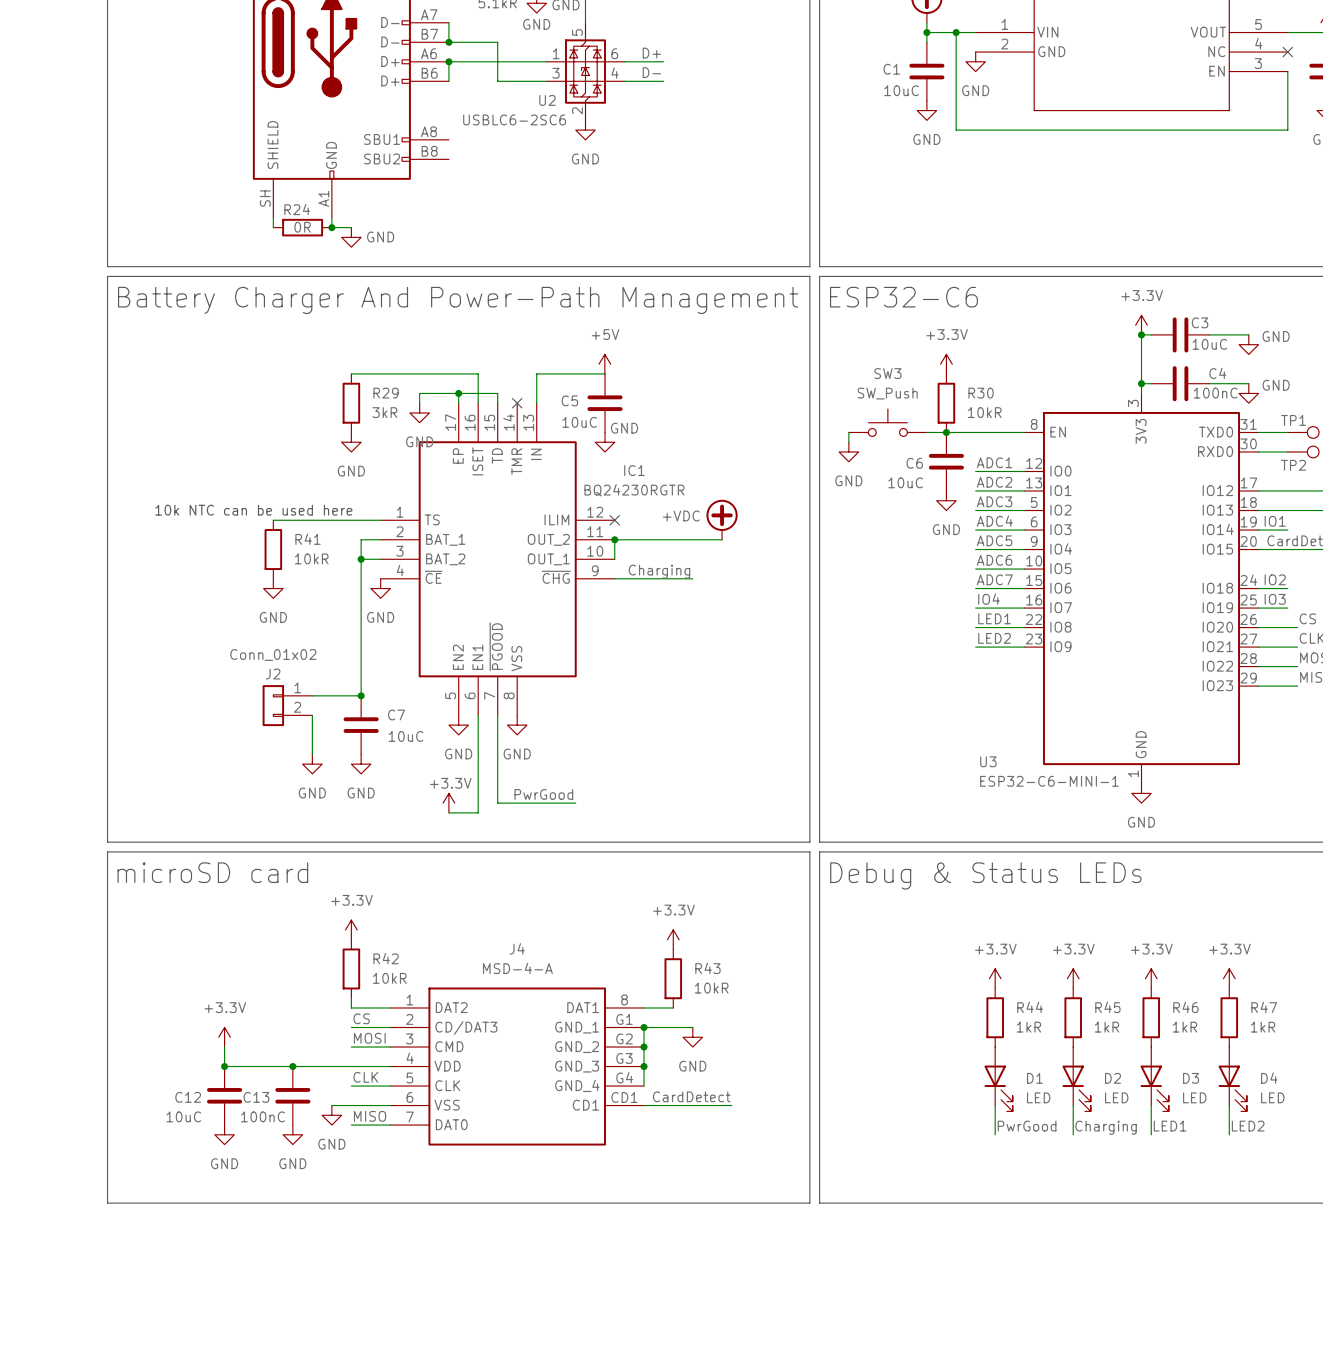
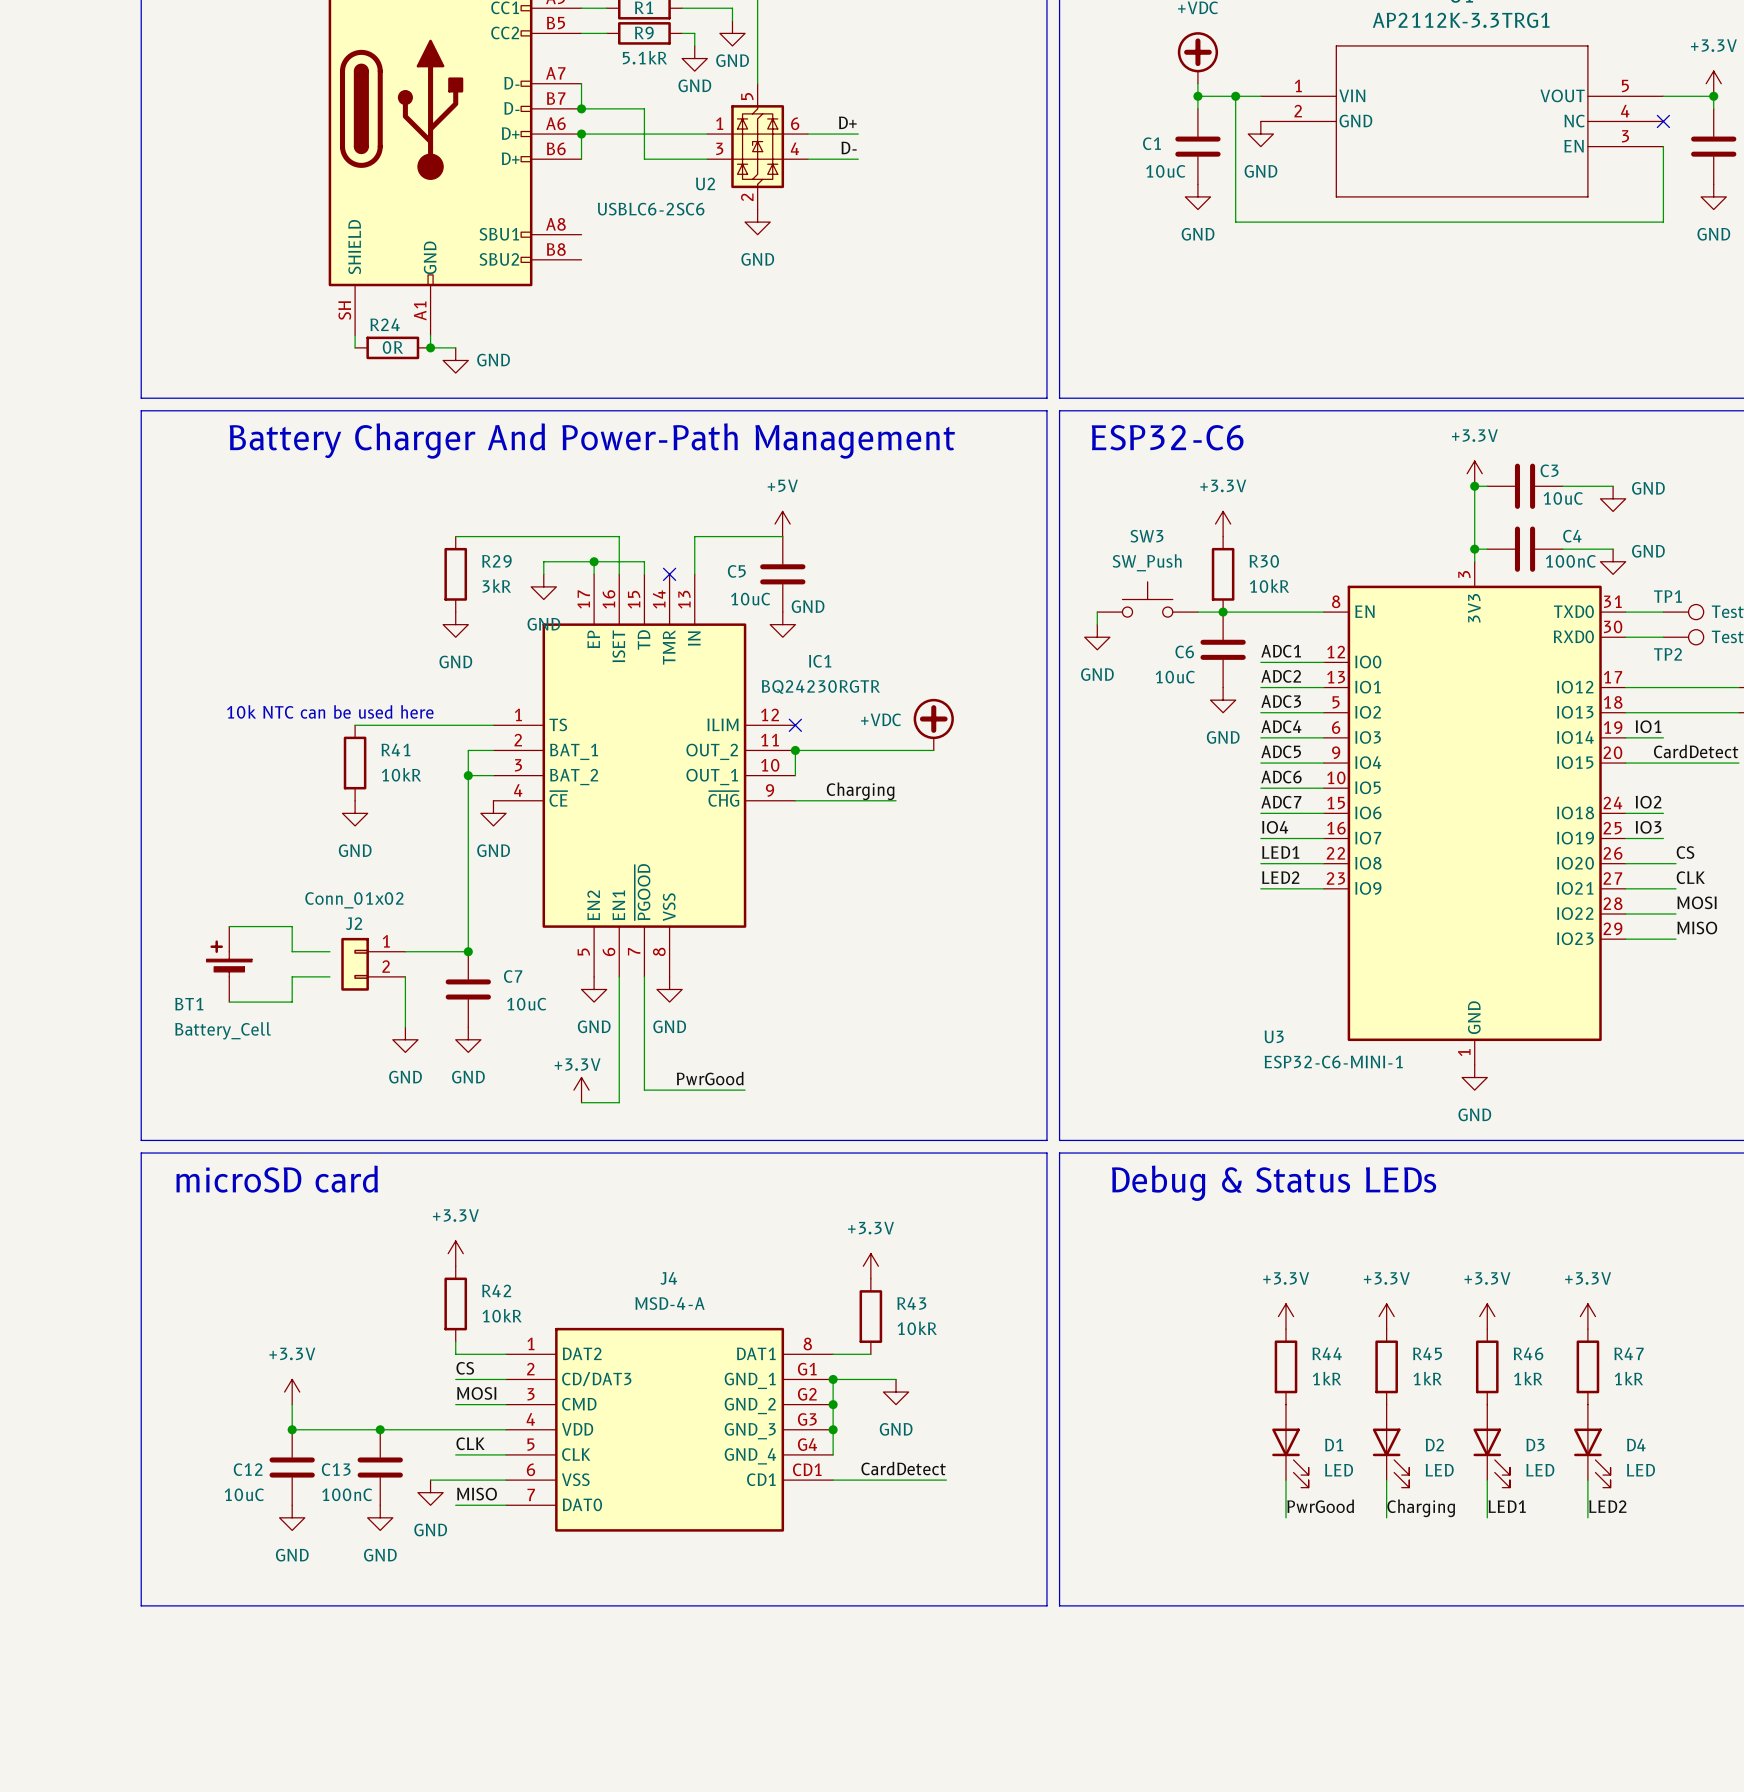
wire: none -> (229, 926) (292, 926) (292, 951) (329, 951)
BT1: none -> Battery_Cell (229, 964)
wire: none -> (329, 976) (292, 976) (292, 1002) (229, 1002)

